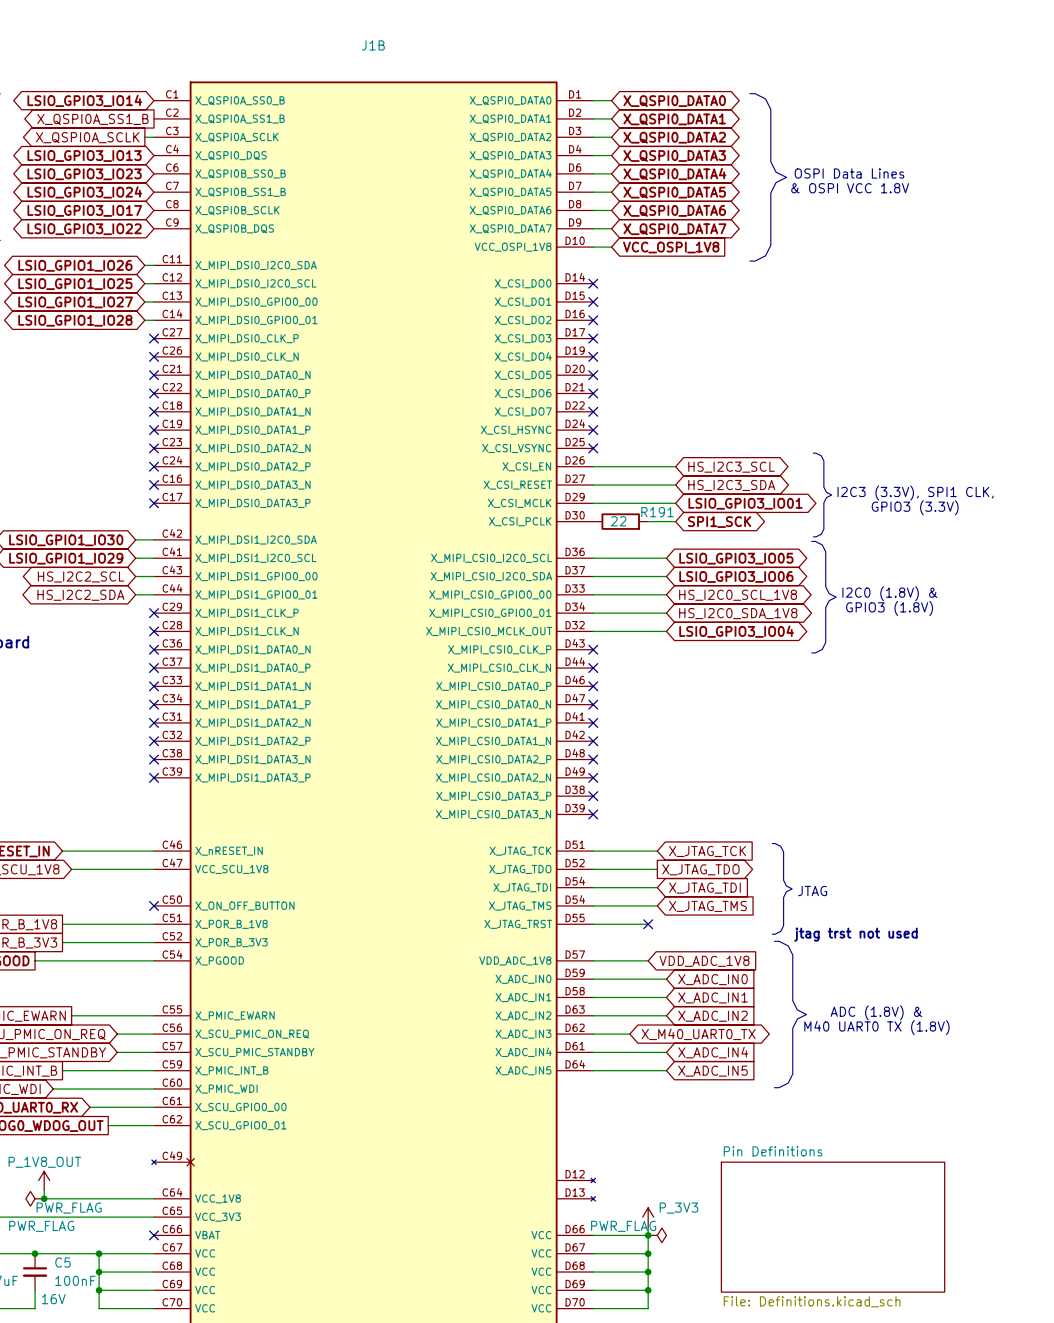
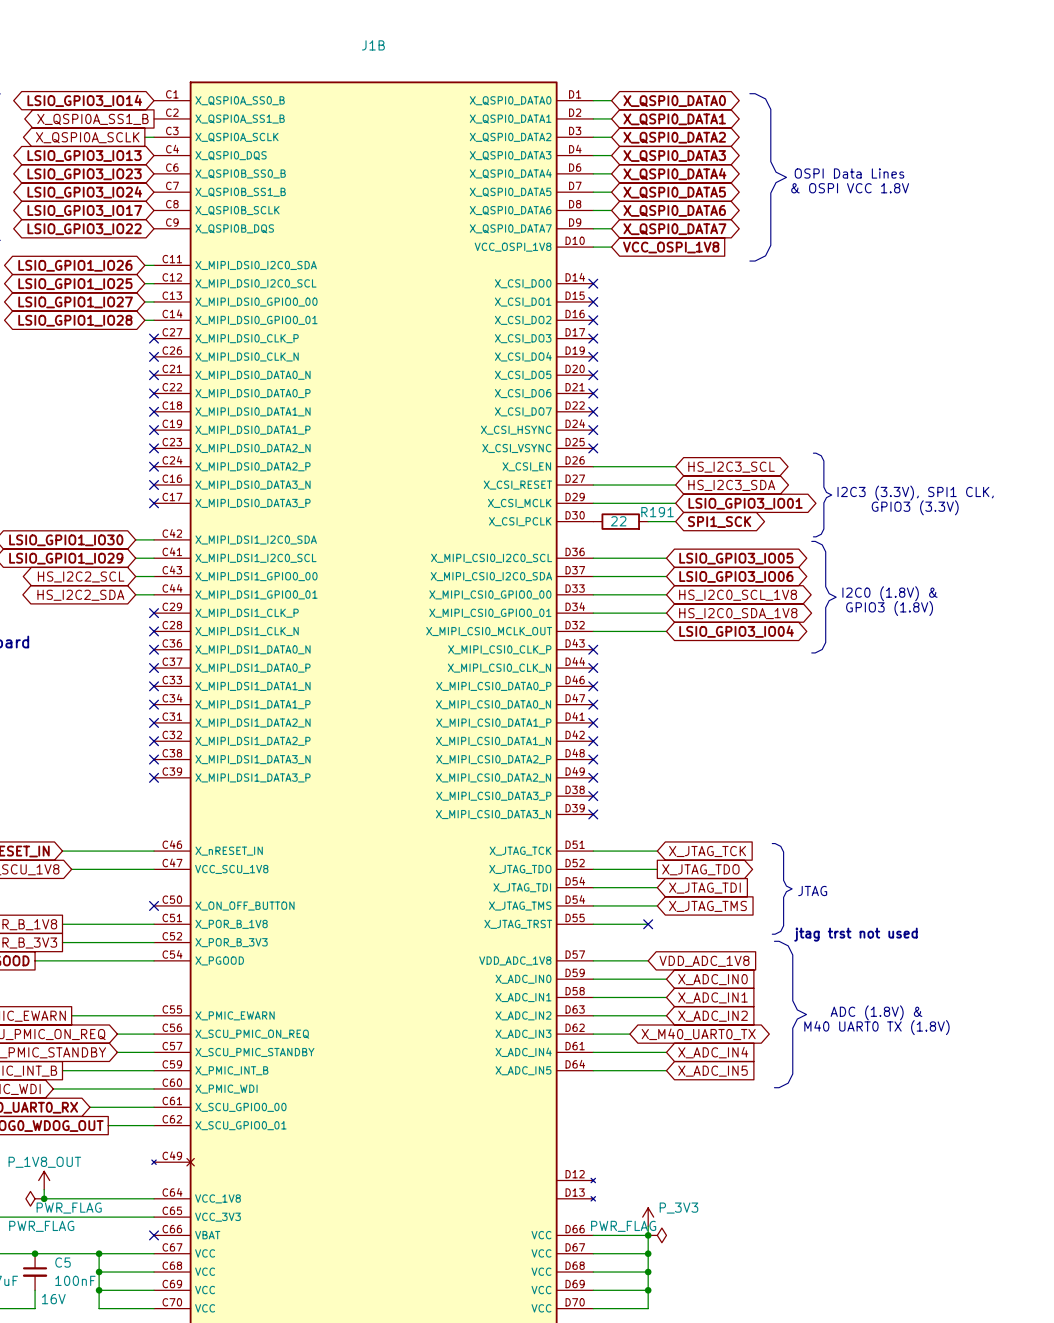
sheet Pin Definitions: File: Definitions.kicad_sch (833, 1227) -> none

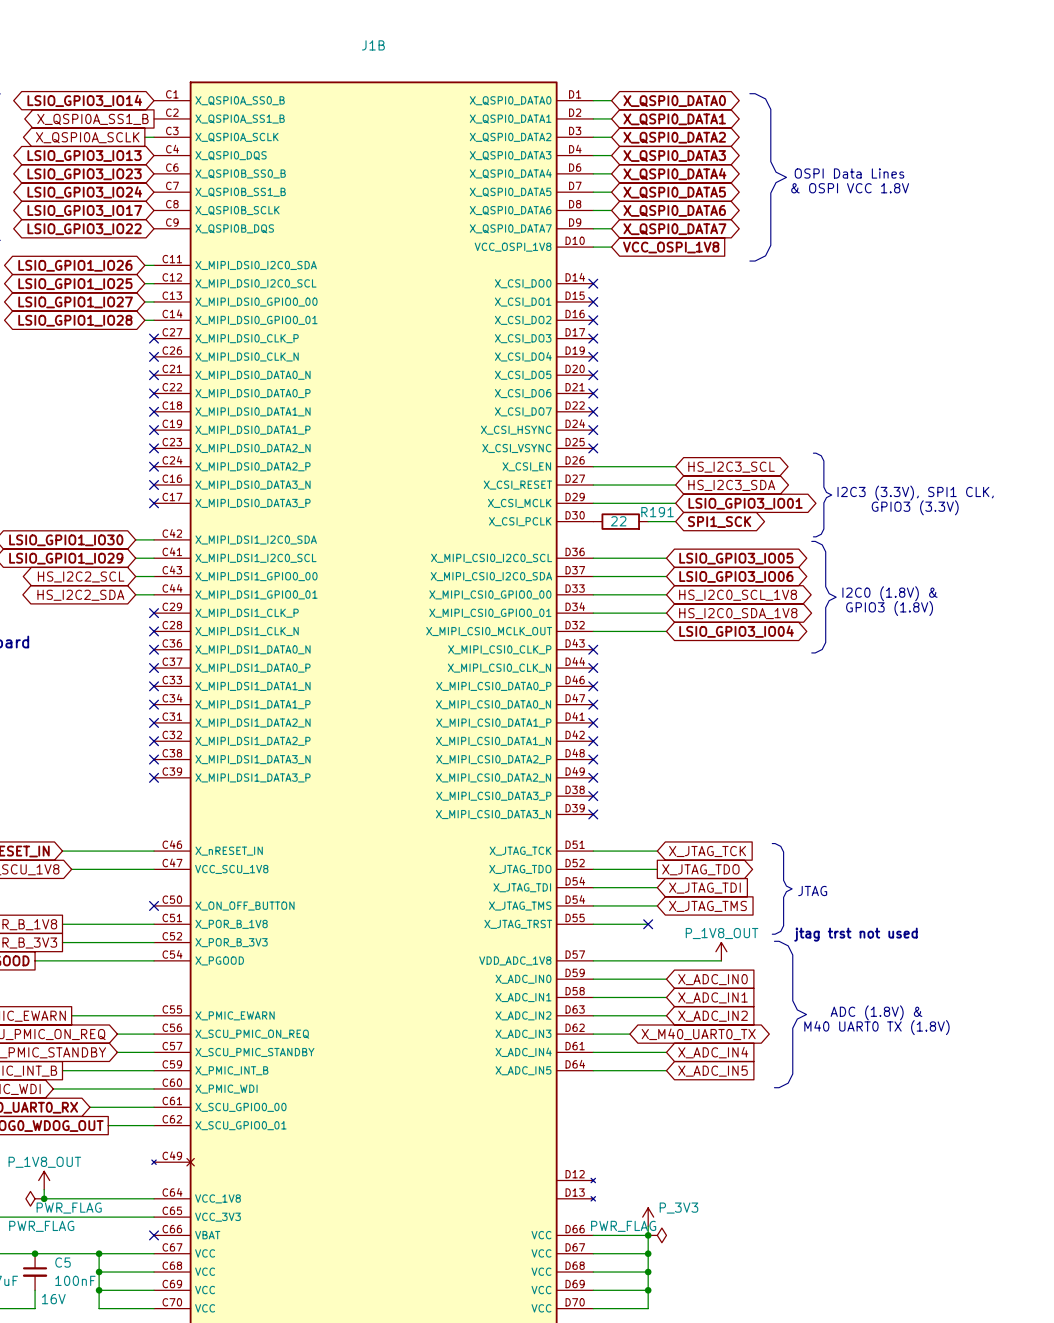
power symbol: none -> P_1V8_OUT (721, 951)
wire: none -> (648, 960) (721, 960)
global label: VDD_ADC_1V8 (704, 961) -> none

